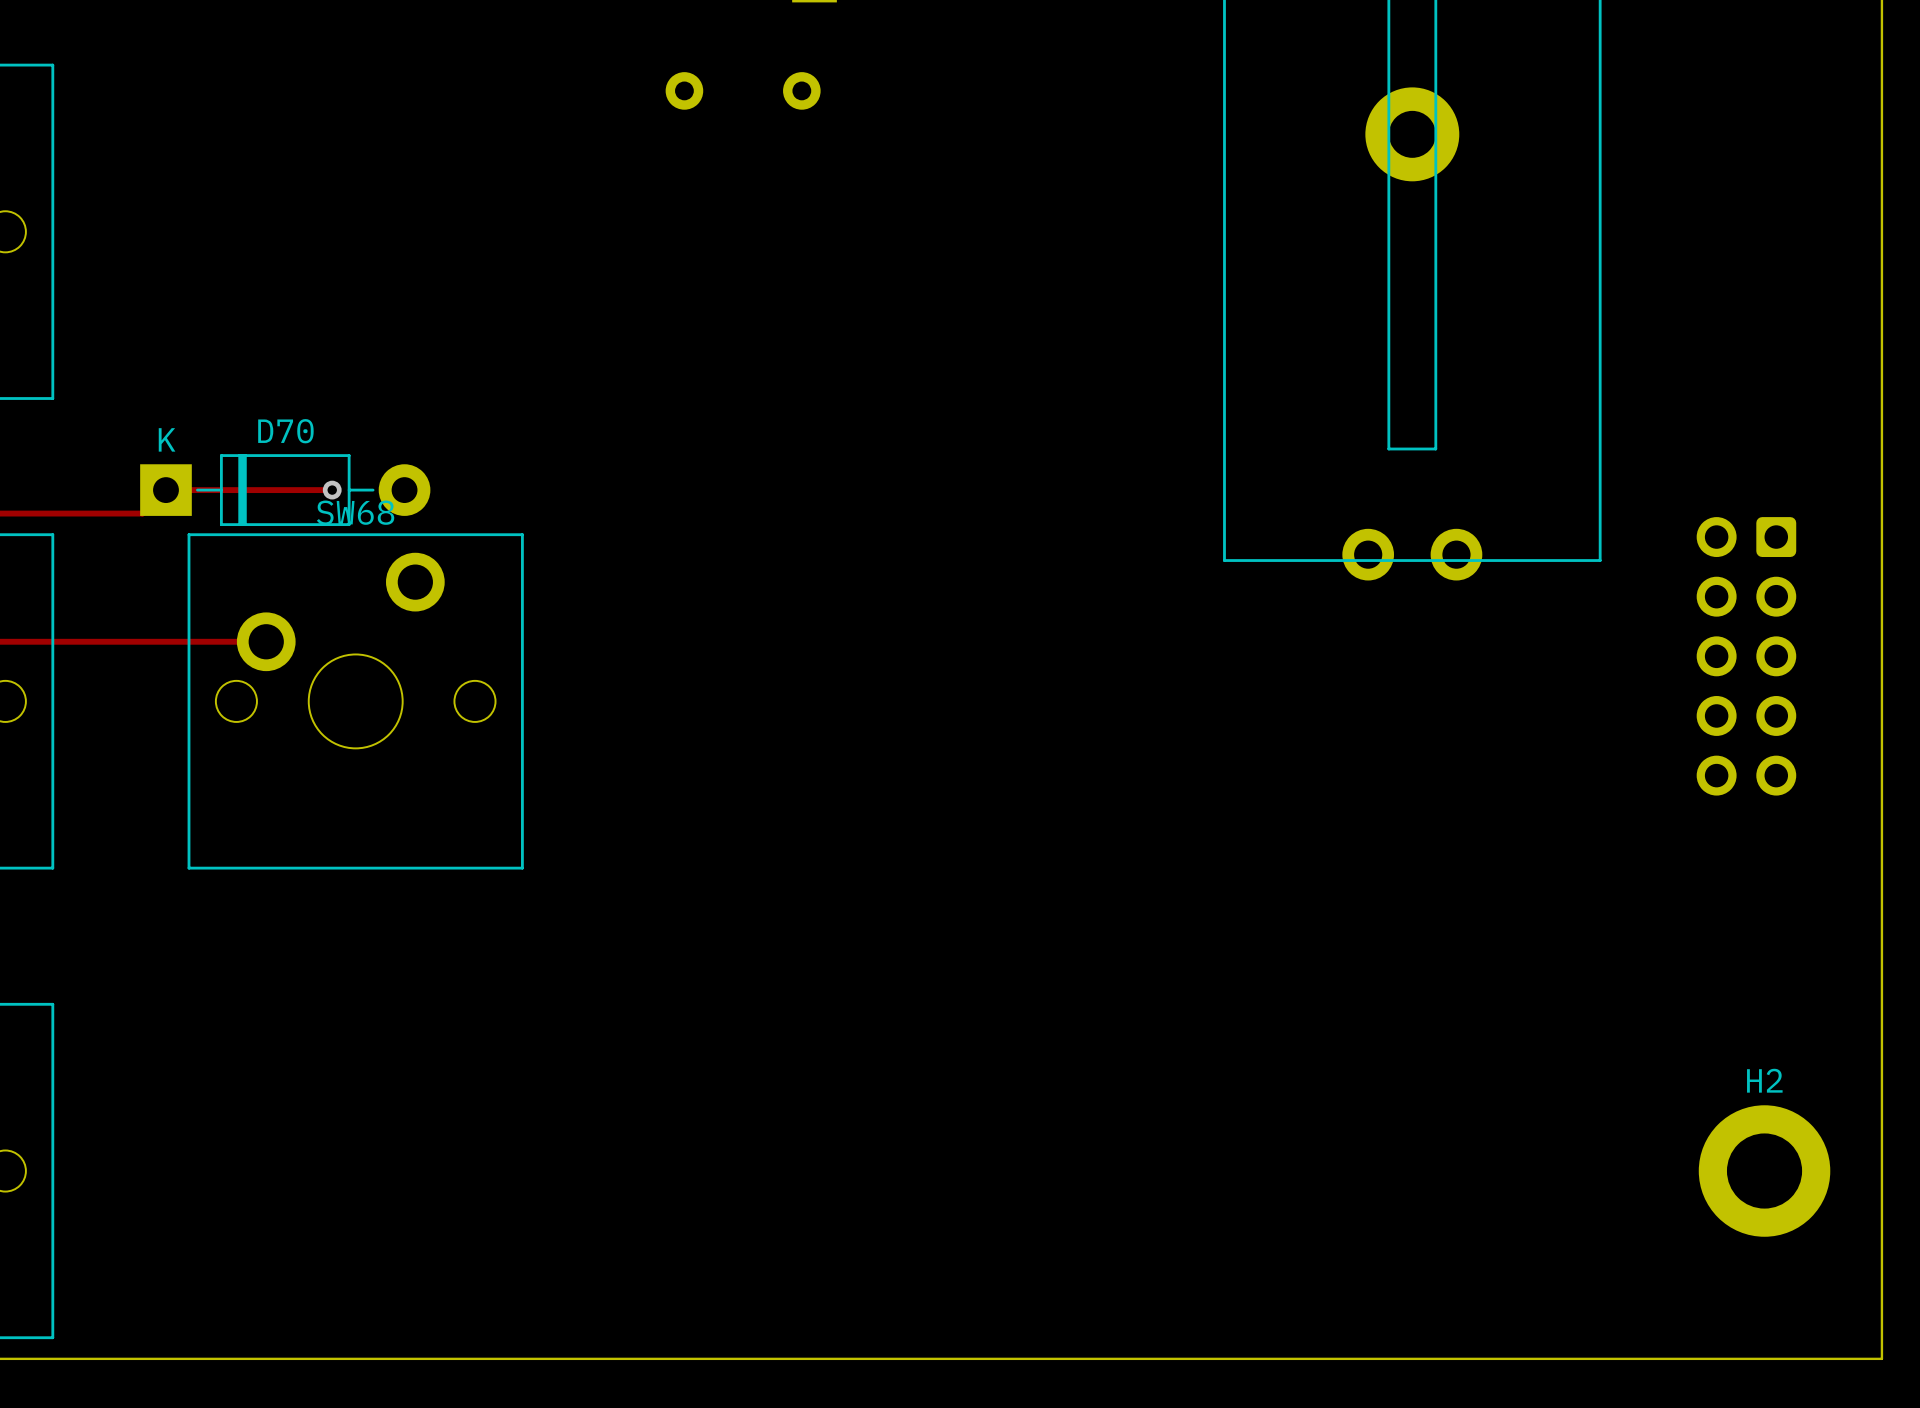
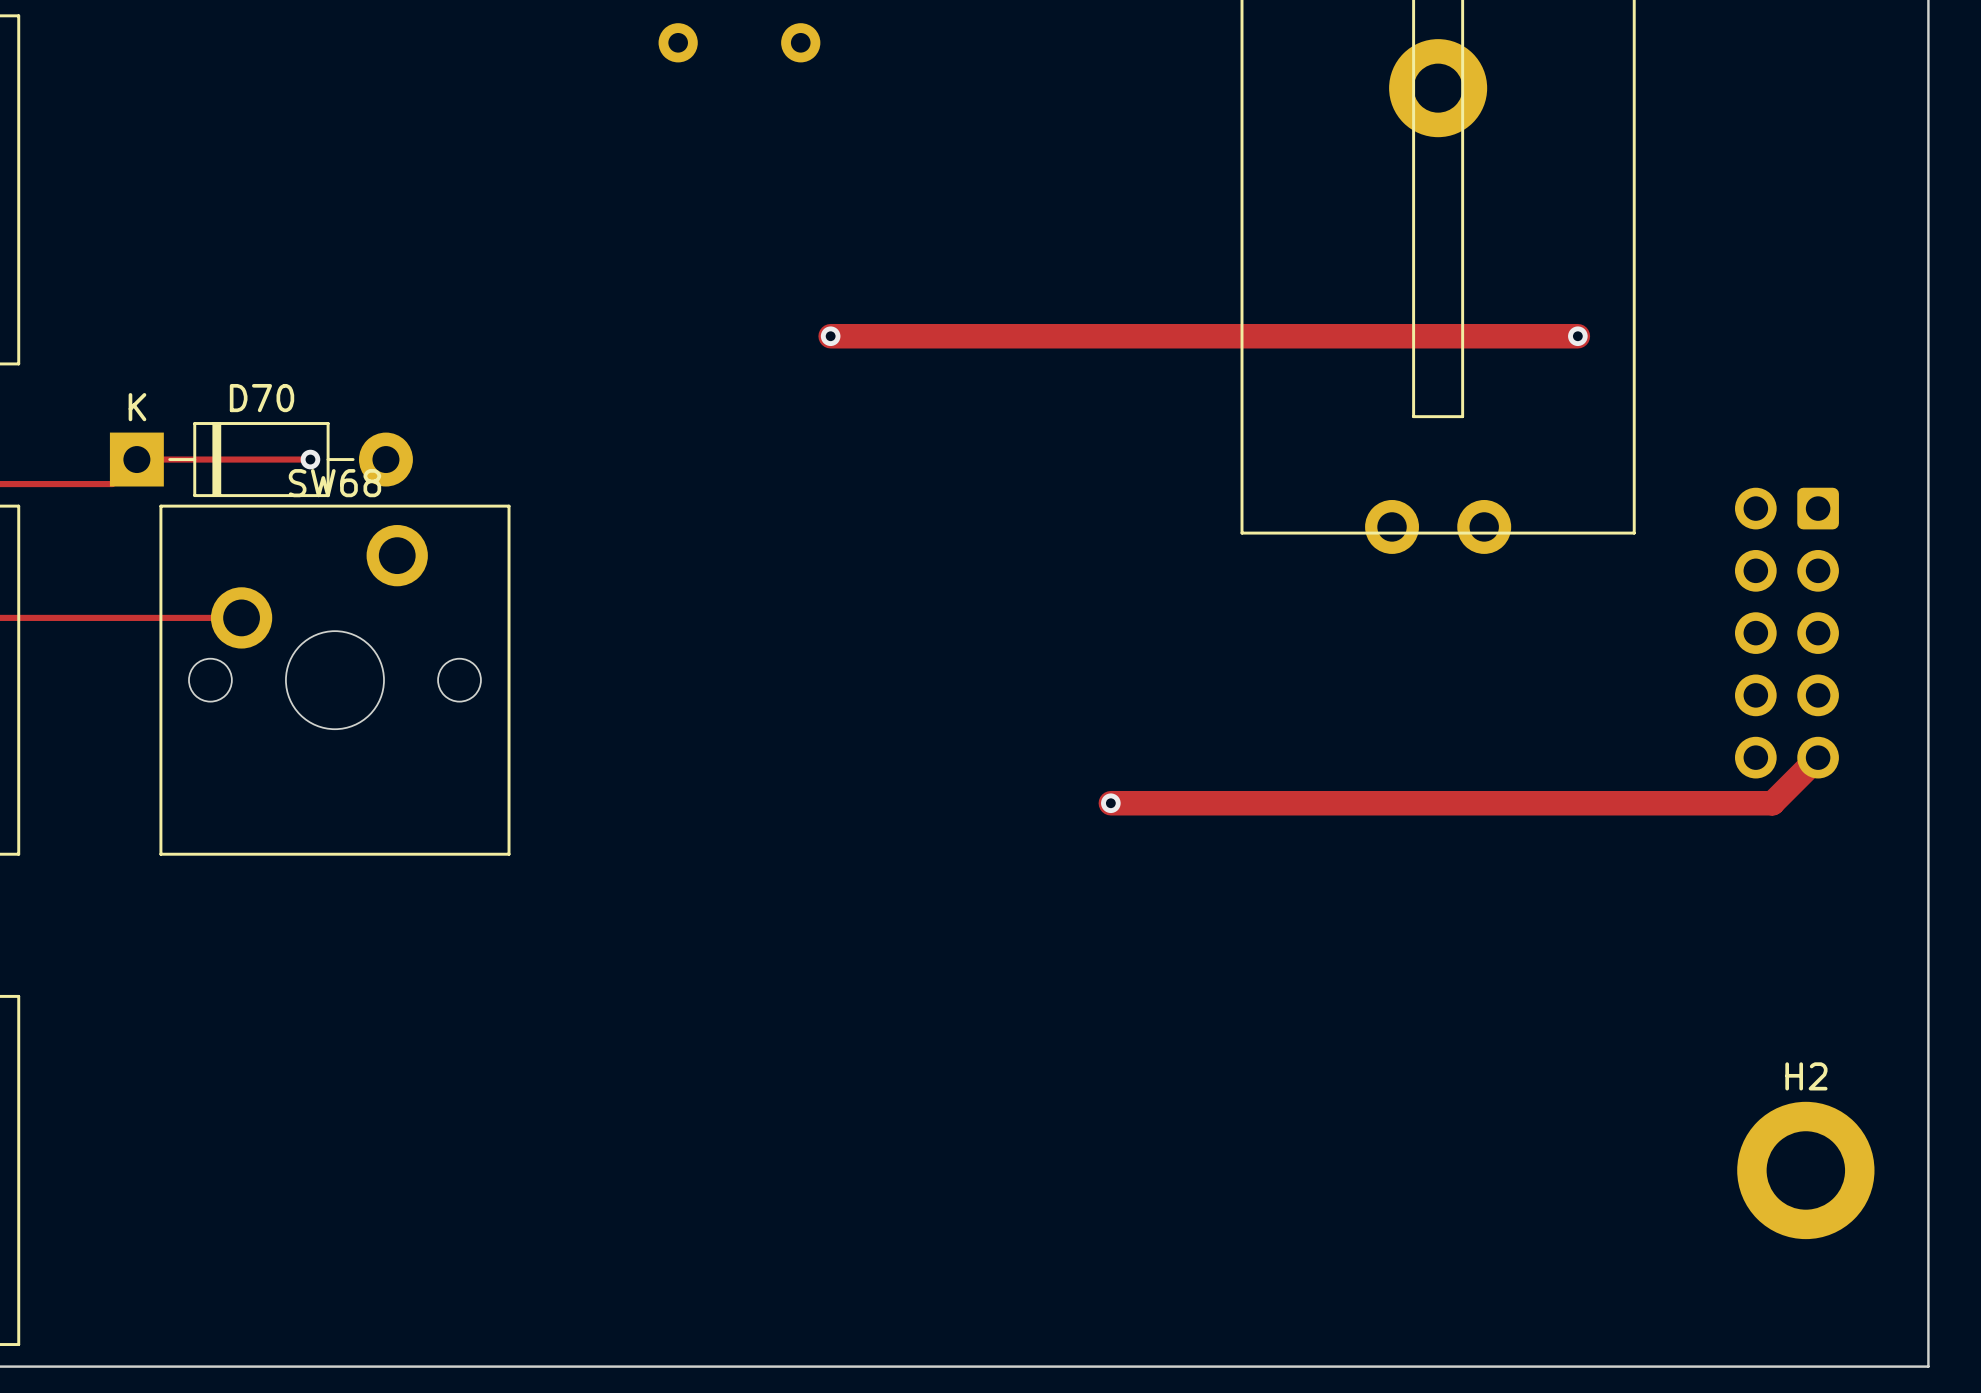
track: none -> (830, 336) (1577, 336)
via: none -> (830, 336)
via: none -> (1577, 336)
track: none -> (1818, 757) (1772, 803) (1110, 803)
via: none -> (1110, 803)

